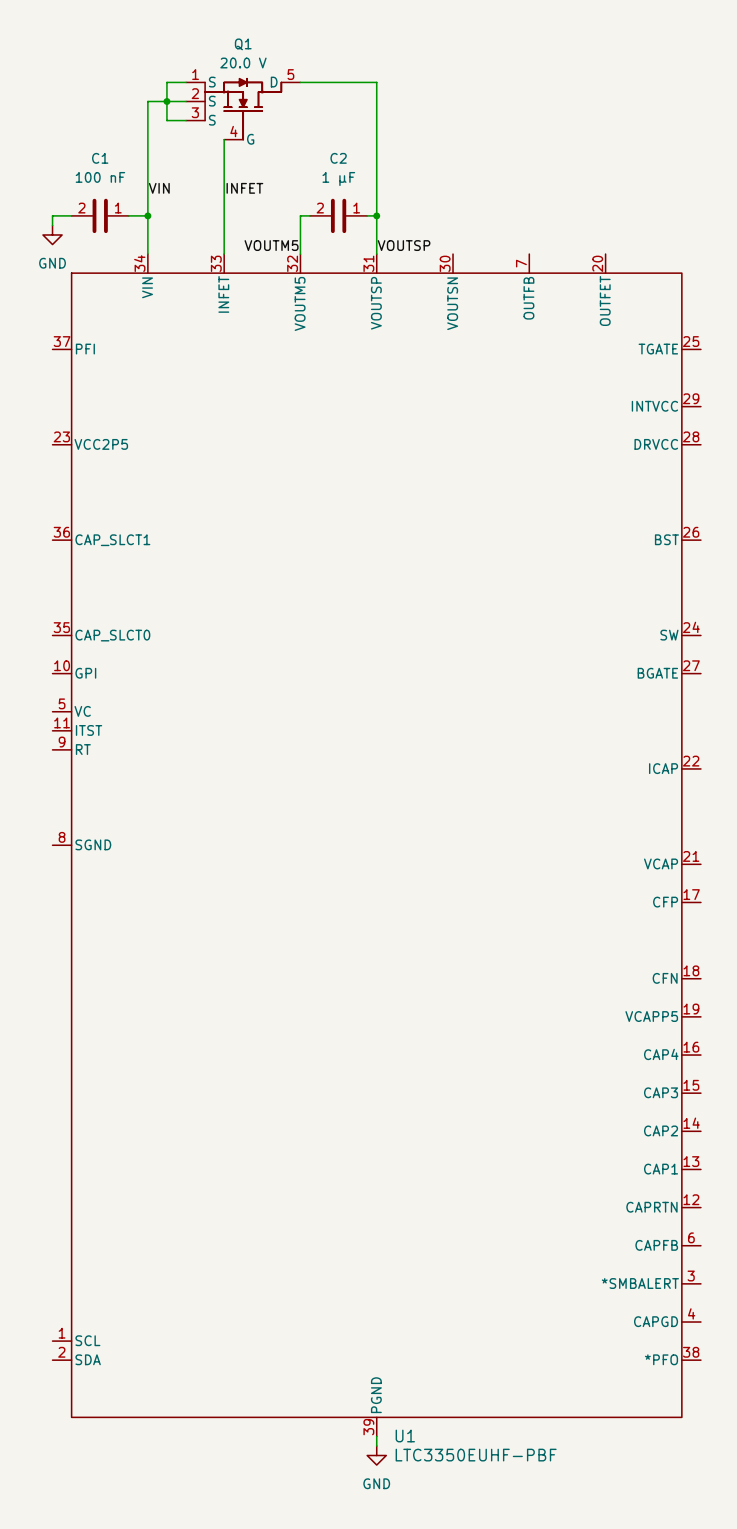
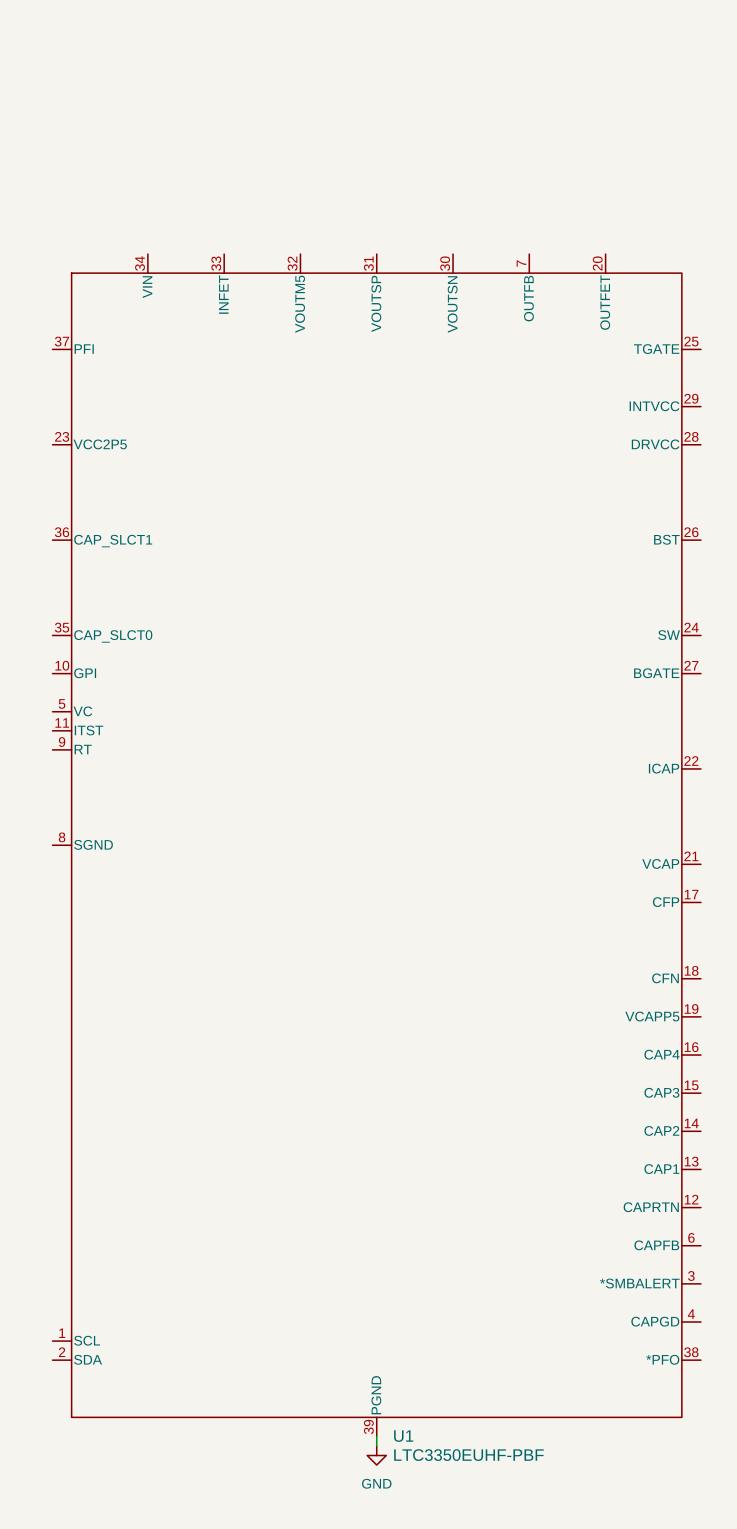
wire: (186, 82) (166, 82) (166, 120) (186, 120) -> none
wire: (300, 82) (376, 82) (376, 254) -> none
junction: (166, 101) -> none
wire: (186, 101) (147, 101) (147, 254) -> none
Q1: 20.0 V (243, 109) -> none
wire: (224, 139) (224, 254) -> none
label: VIN (159, 188) -> none
label: INFET (244, 188) -> none
wire: (71, 215) (52, 215) (52, 225) -> none
C1: 100 nF (100, 215) -> none
wire: (128, 215) (147, 215) -> none
junction: (147, 215) -> none
wire: (309, 215) (300, 215) (300, 254) -> none
C2: 1 µF (338, 215) -> none
wire: (367, 215) (376, 215) -> none
junction: (376, 215) -> none
power symbol: GND (52, 234) -> none
label: VOUTM5 (271, 245) -> none
label: VOUTSP (404, 245) -> none

